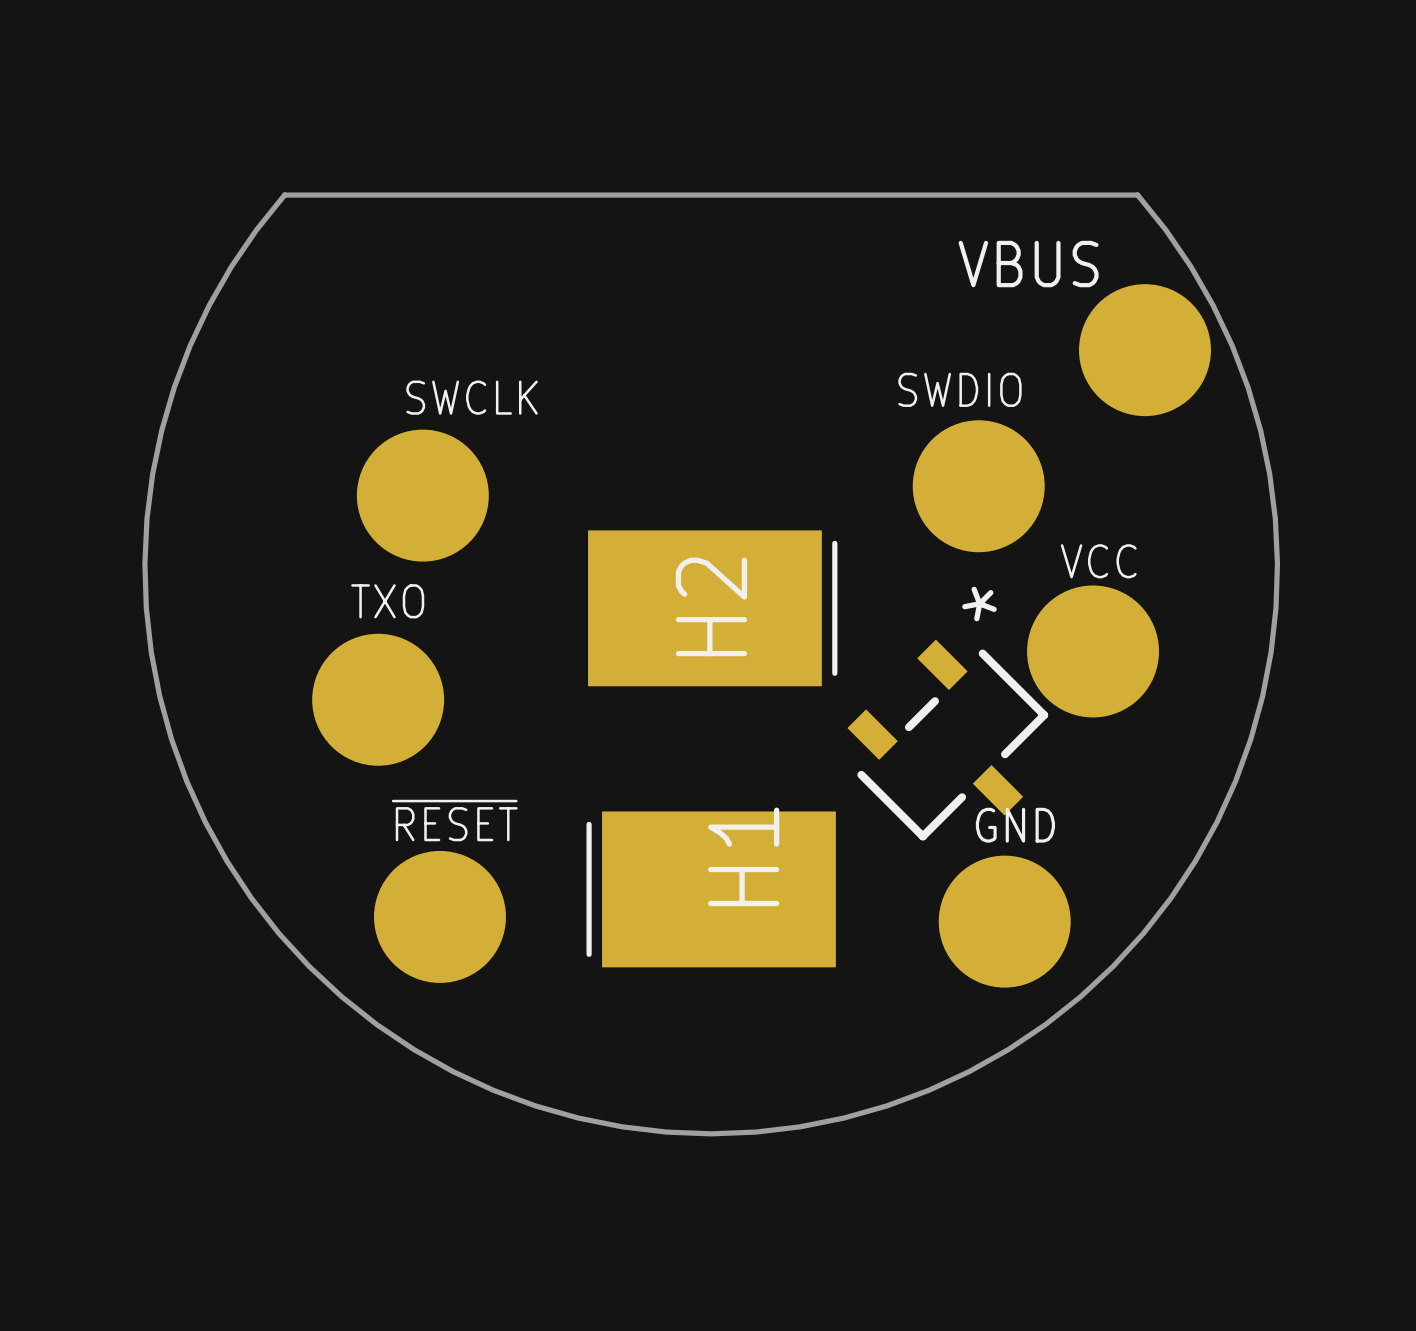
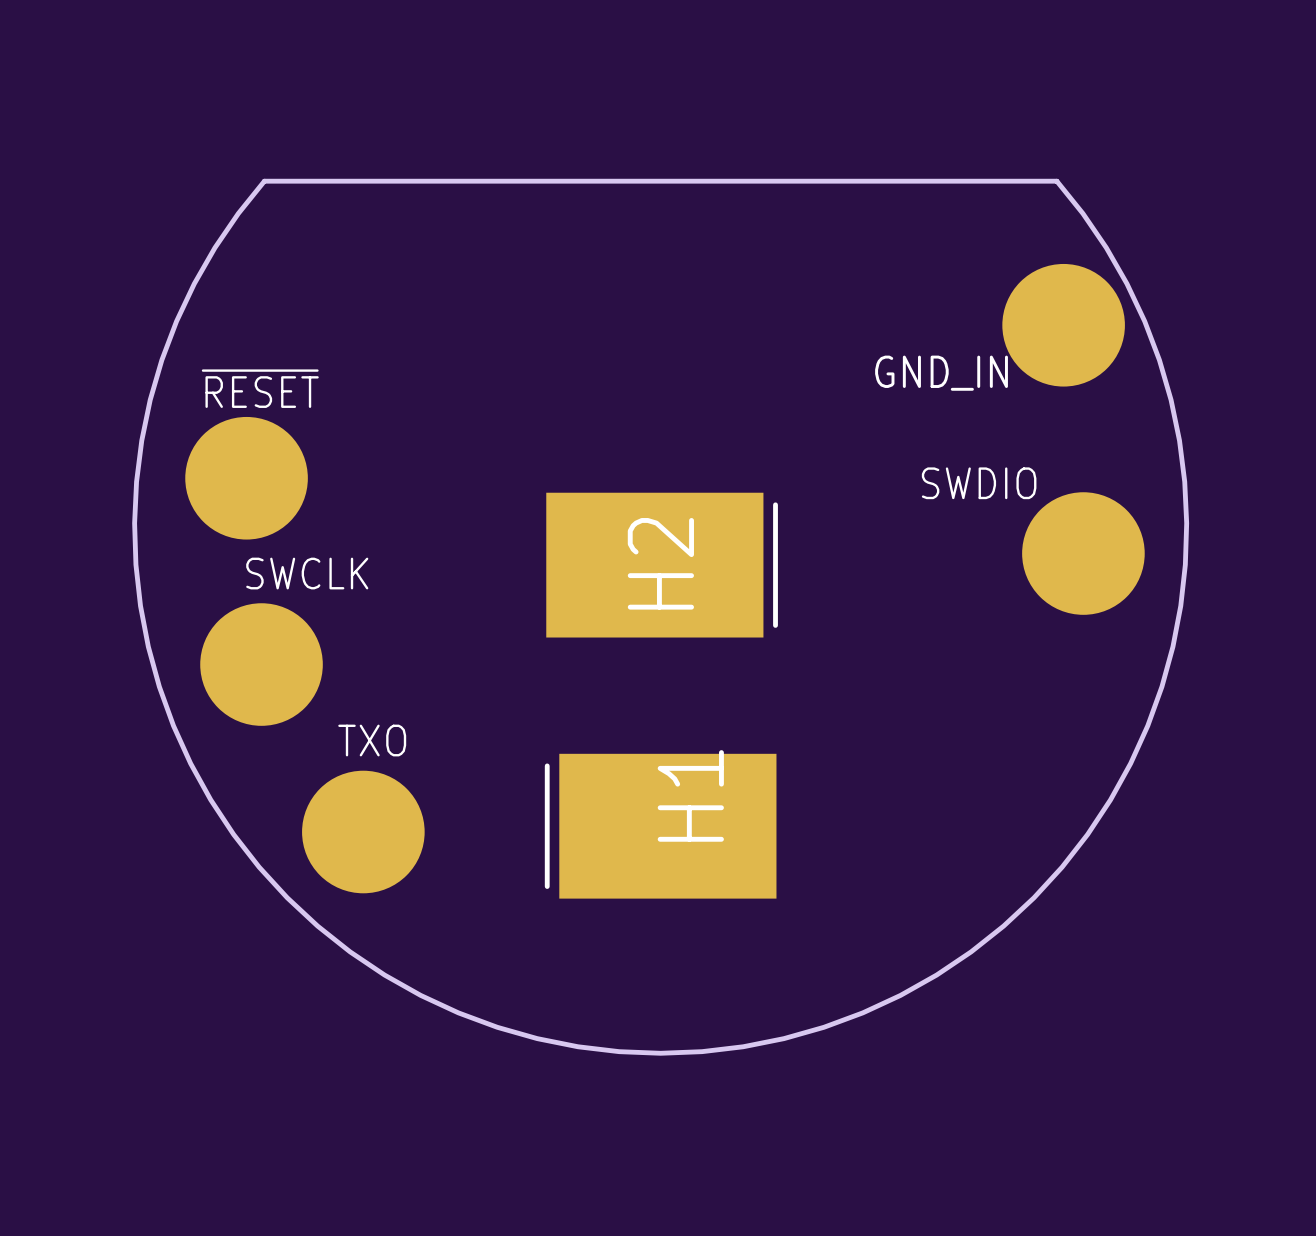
VBUS name: VBUS (1028, 264) -> GND_IN (941, 373)
SWDIO name position: SWDIO (959, 389) -> SWDIO (979, 483)
SWDIO position: (978, 486) -> (1083, 553)
SWCLK position: (422, 495) -> (261, 664)
VCC: (1093, 651) -> none
TXO position: (378, 699) -> (363, 832)
part: (947, 740) -> none
~{RESET} position: (439, 916) -> (246, 478)
GND: (1004, 921) -> none

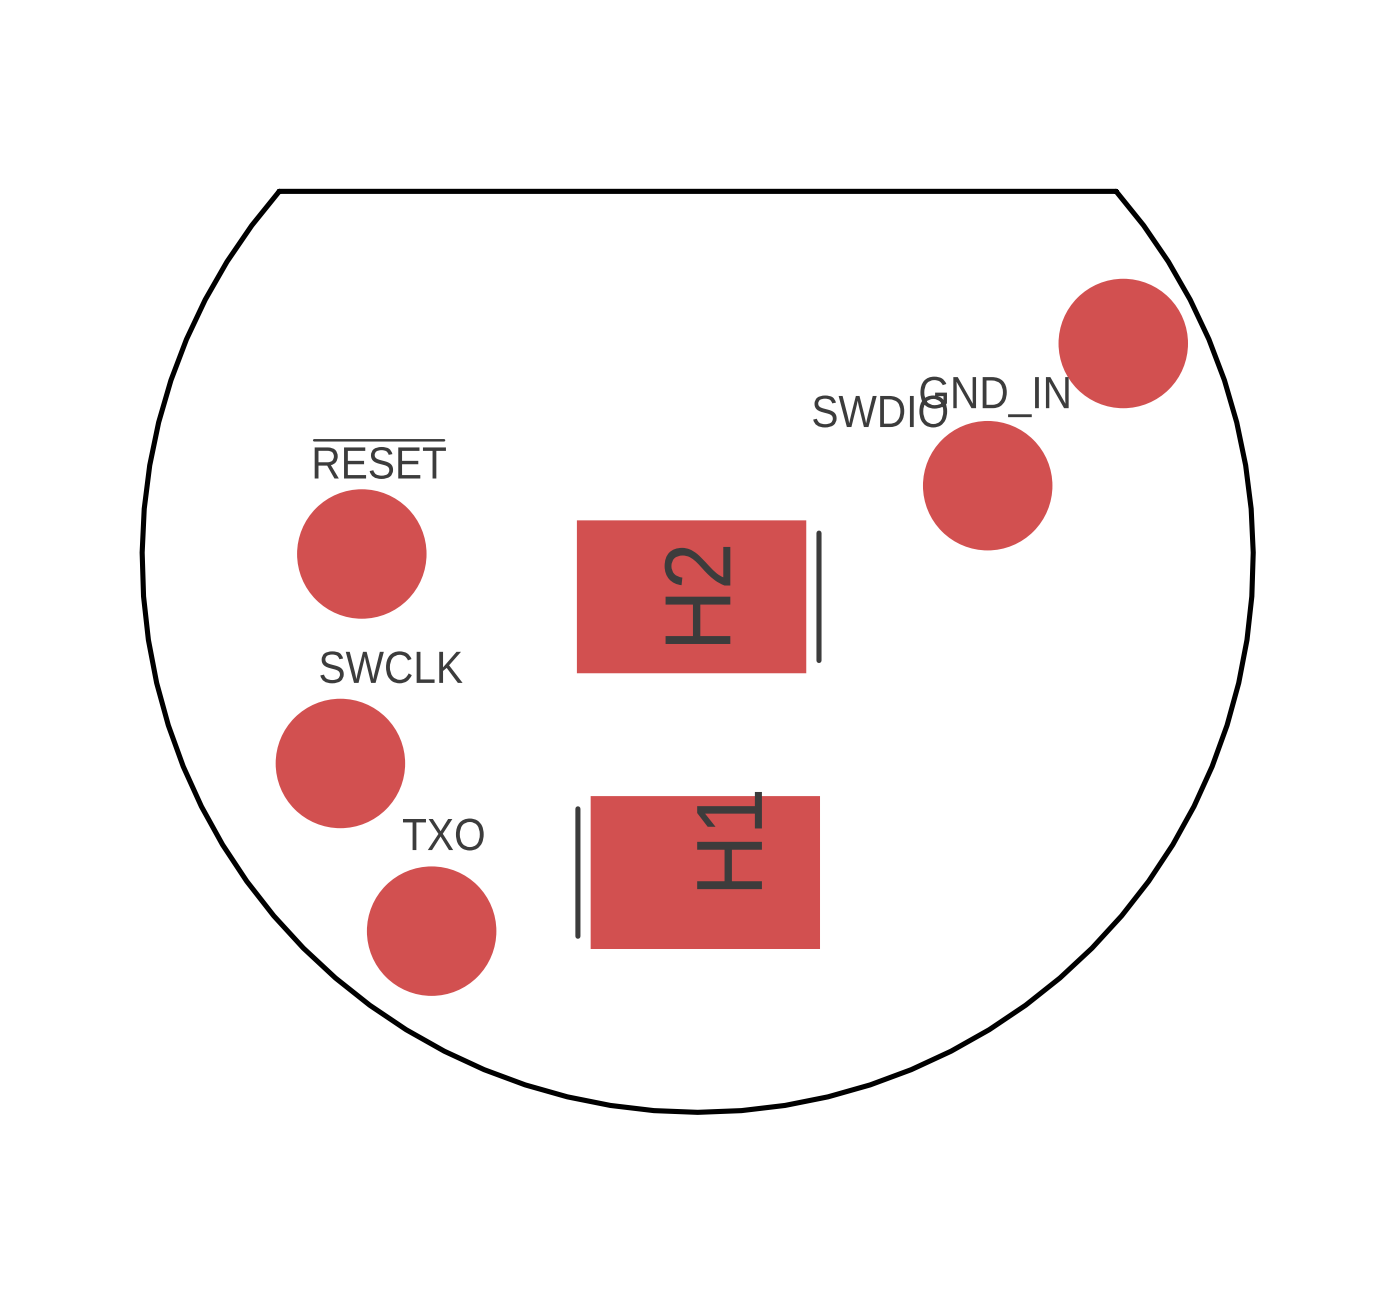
~{RESET} position: (246, 478) -> (361, 553)
SWDIO position: (1083, 553) -> (987, 485)
SWCLK position: (261, 664) -> (340, 763)
TXO position: (363, 832) -> (431, 931)

